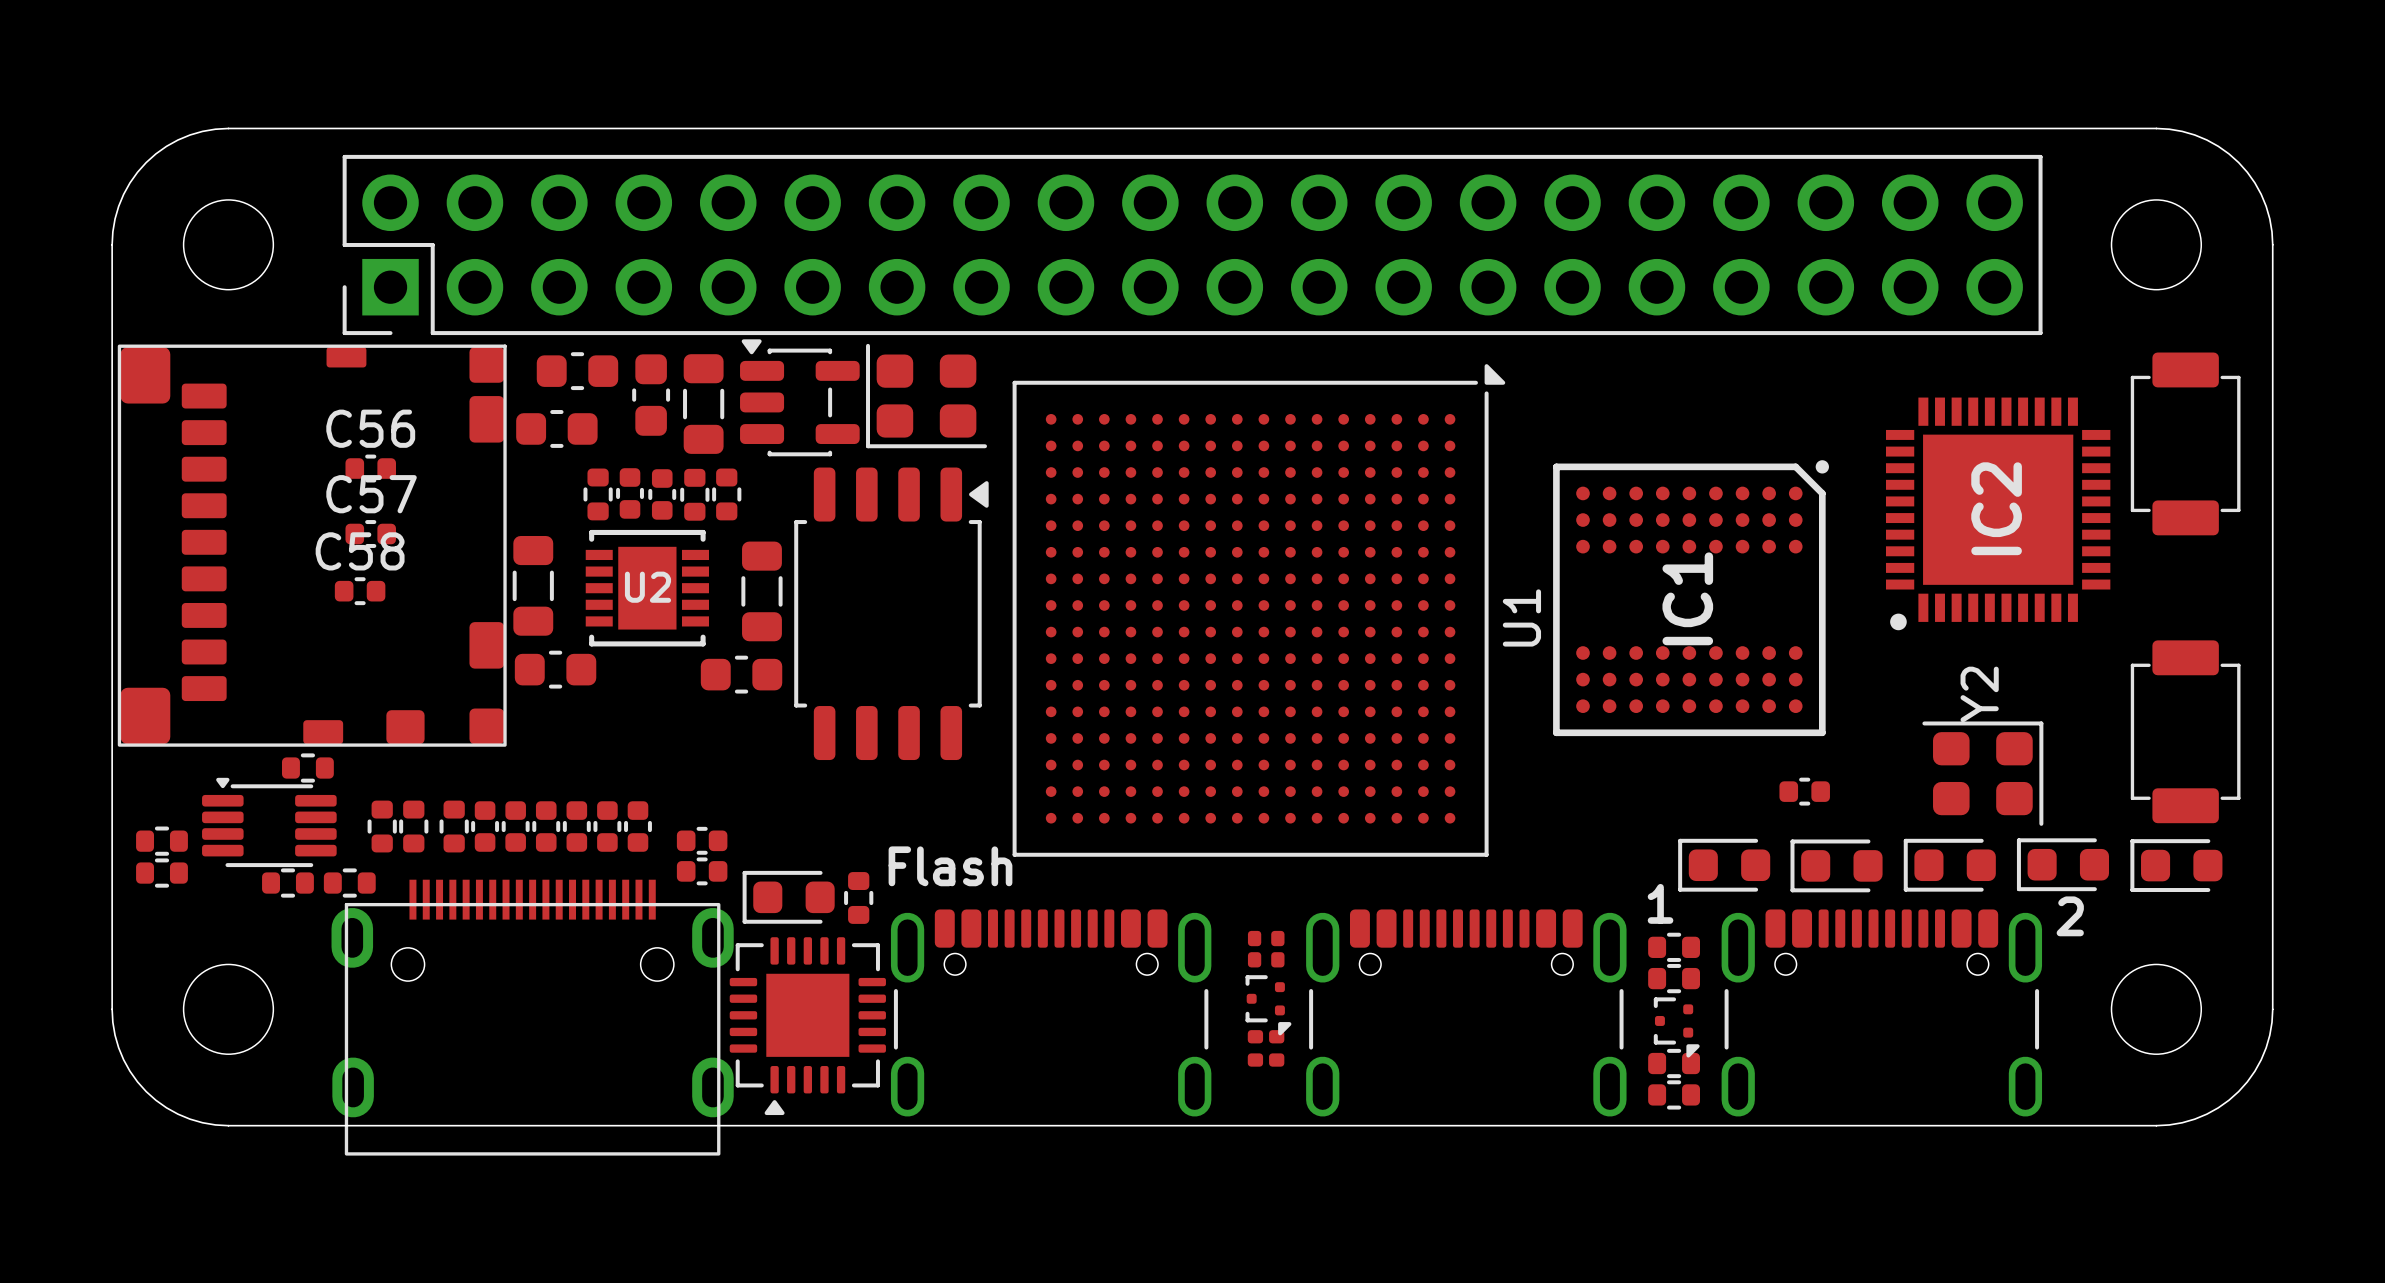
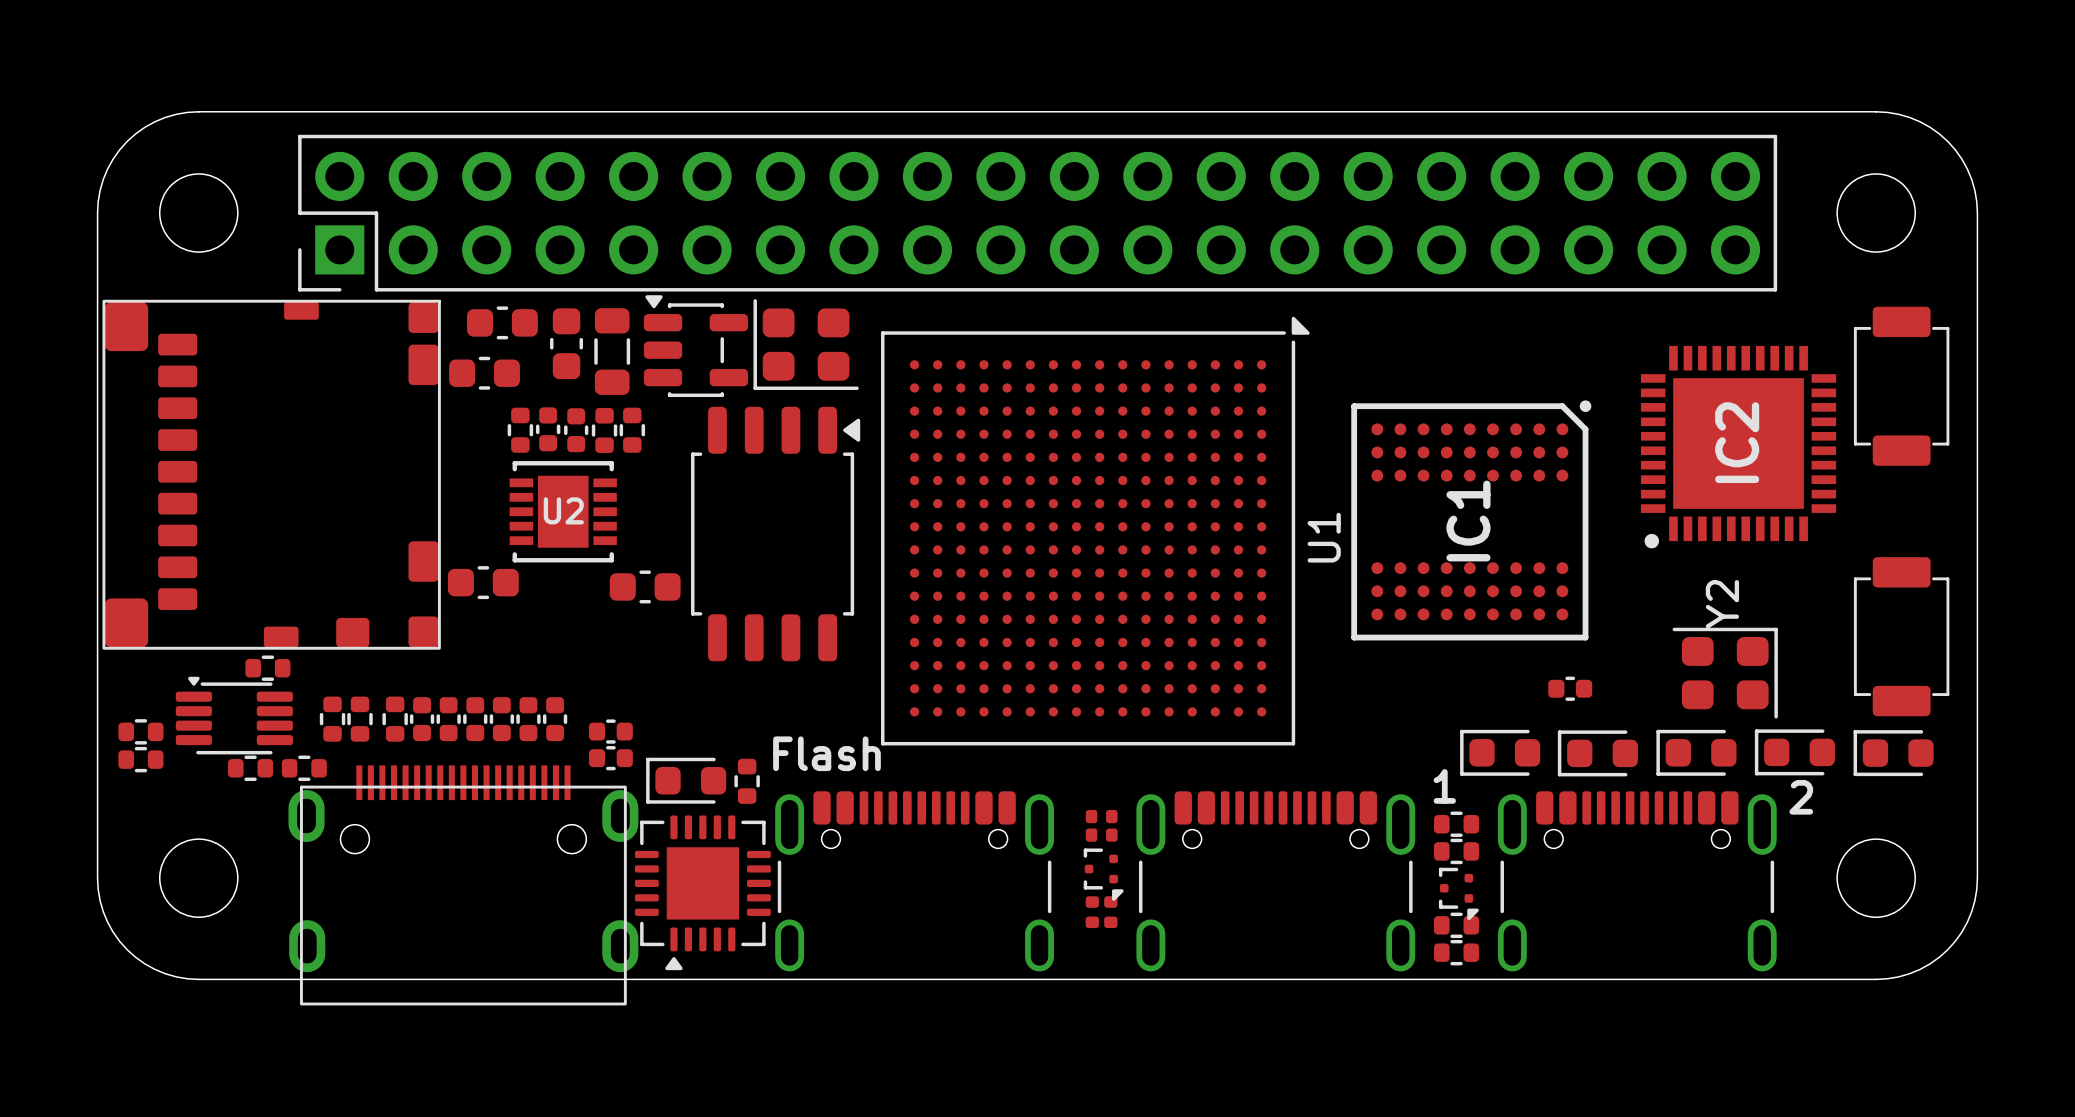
C56: (370, 468) -> none
C57: (370, 534) -> none
part: (533, 585) -> none
C58: (360, 591) -> none
part: (761, 591) -> none

